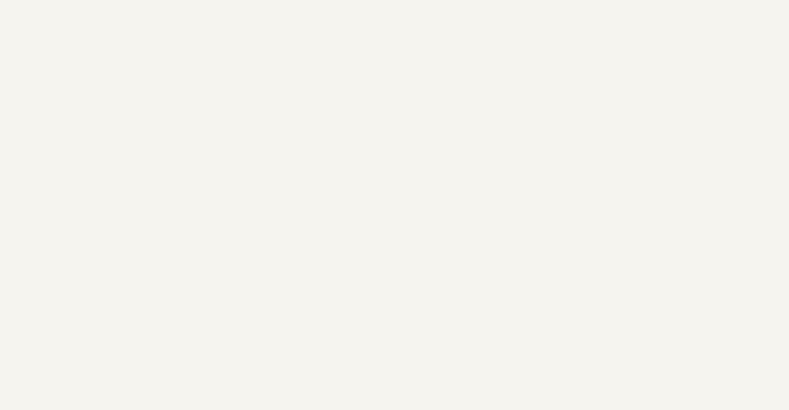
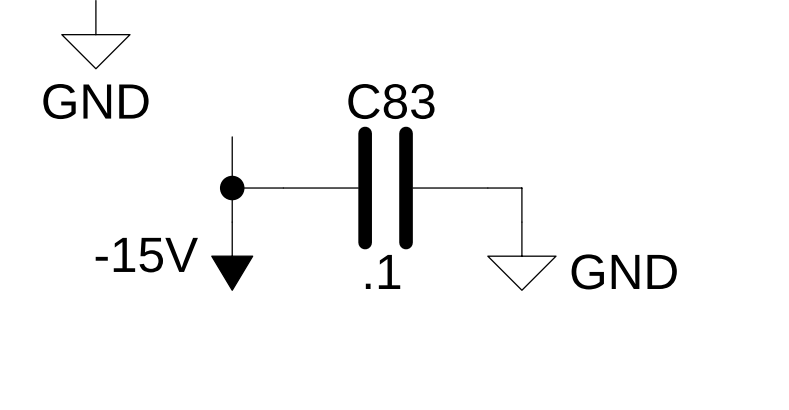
power symbol: none -> GND (95, 34)
wire: none -> (232, 136) (232, 222)
wire: none -> (232, 188) (283, 188)
junction: none -> (232, 188)
C83: none -> .1 (385, 188)
wire: none -> (487, 188) (521, 188) (521, 222)
power symbol: none -> -15V (232, 256)
power symbol: none -> GND (521, 256)

